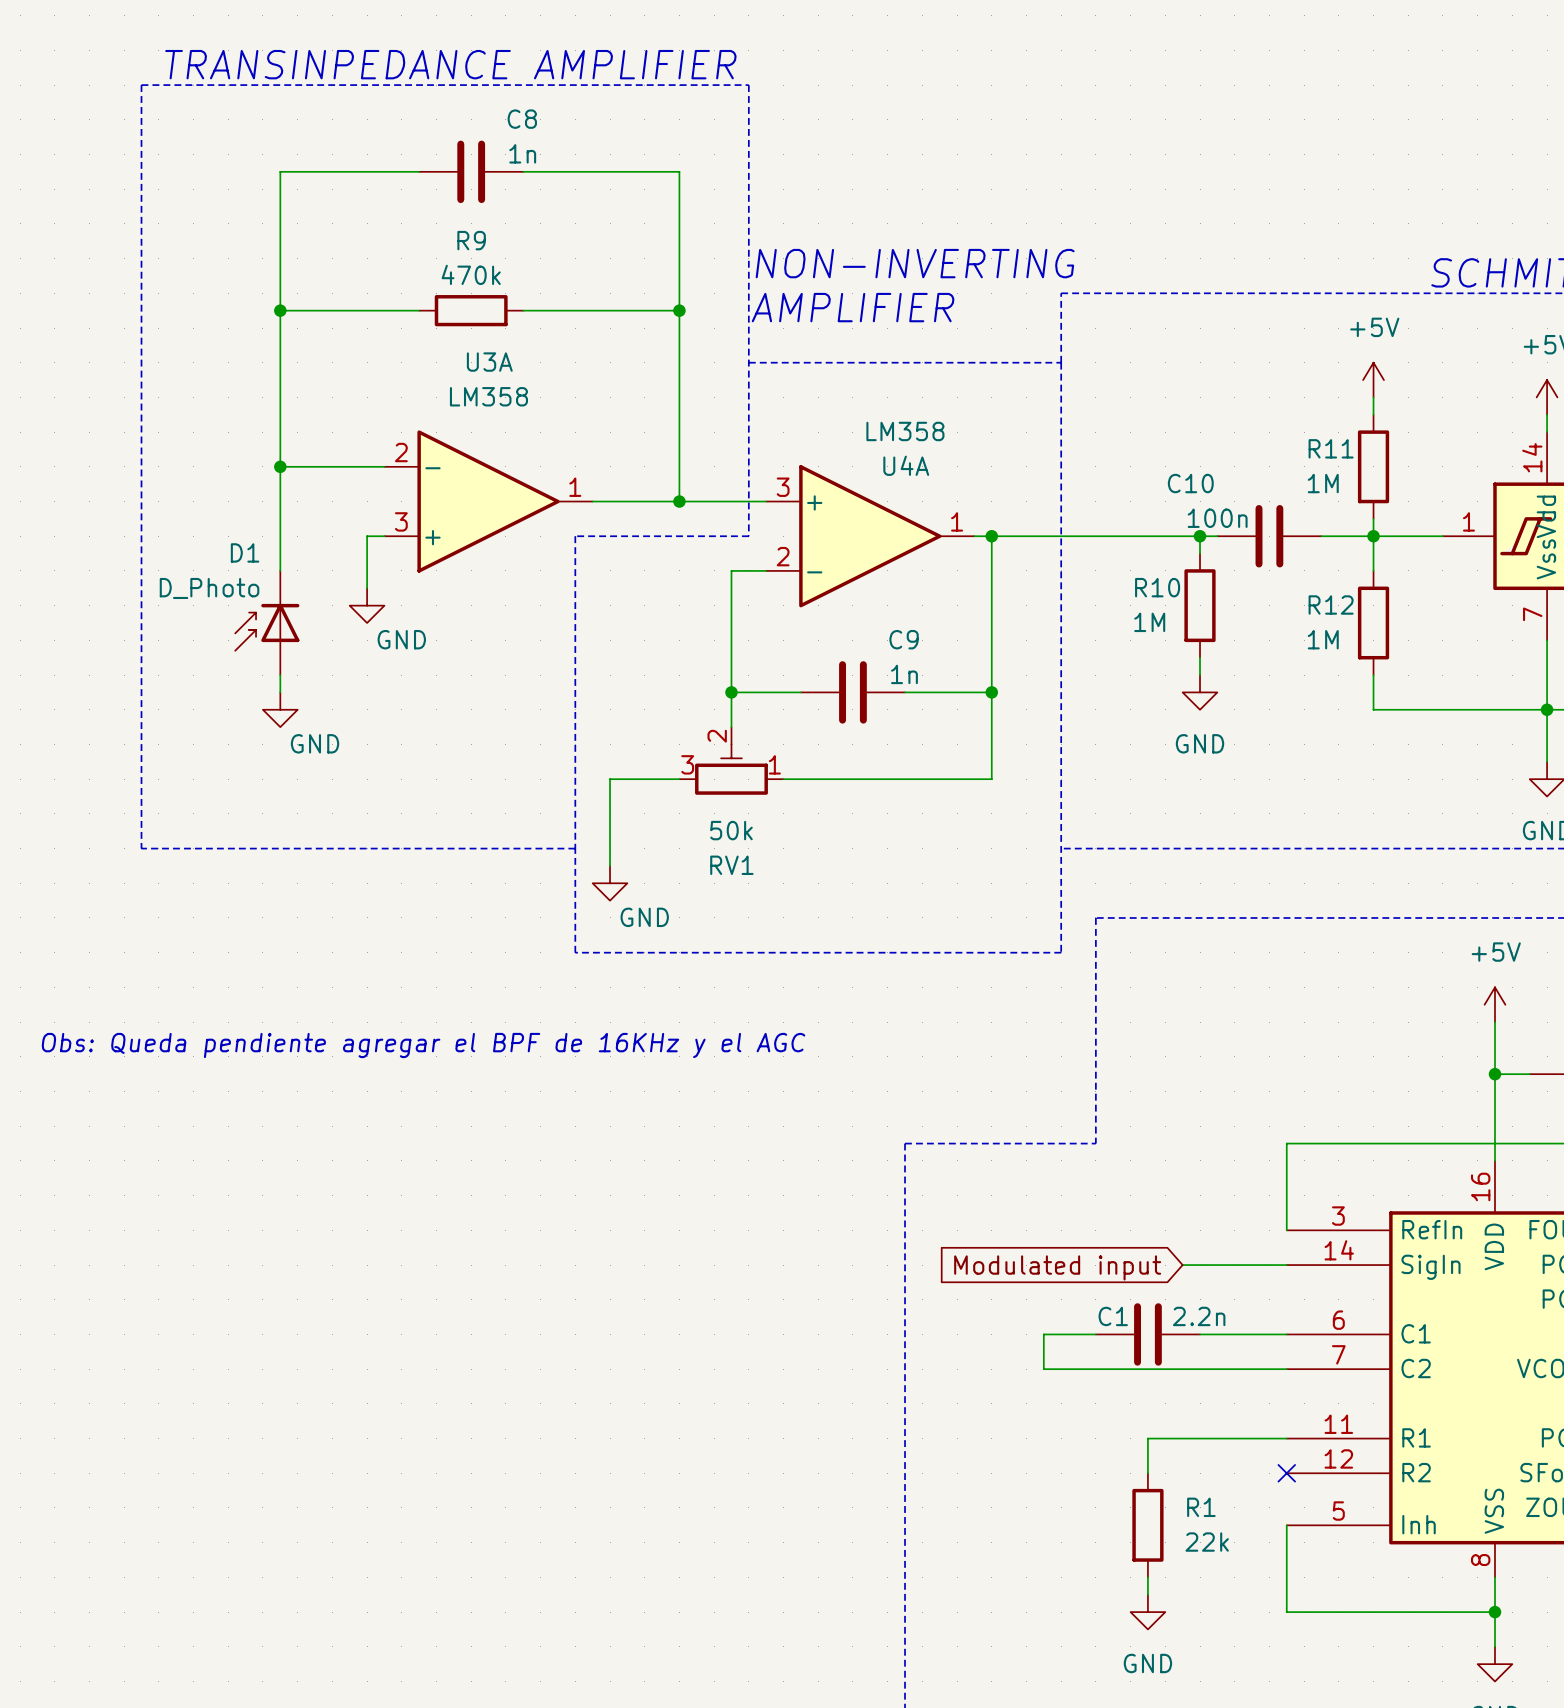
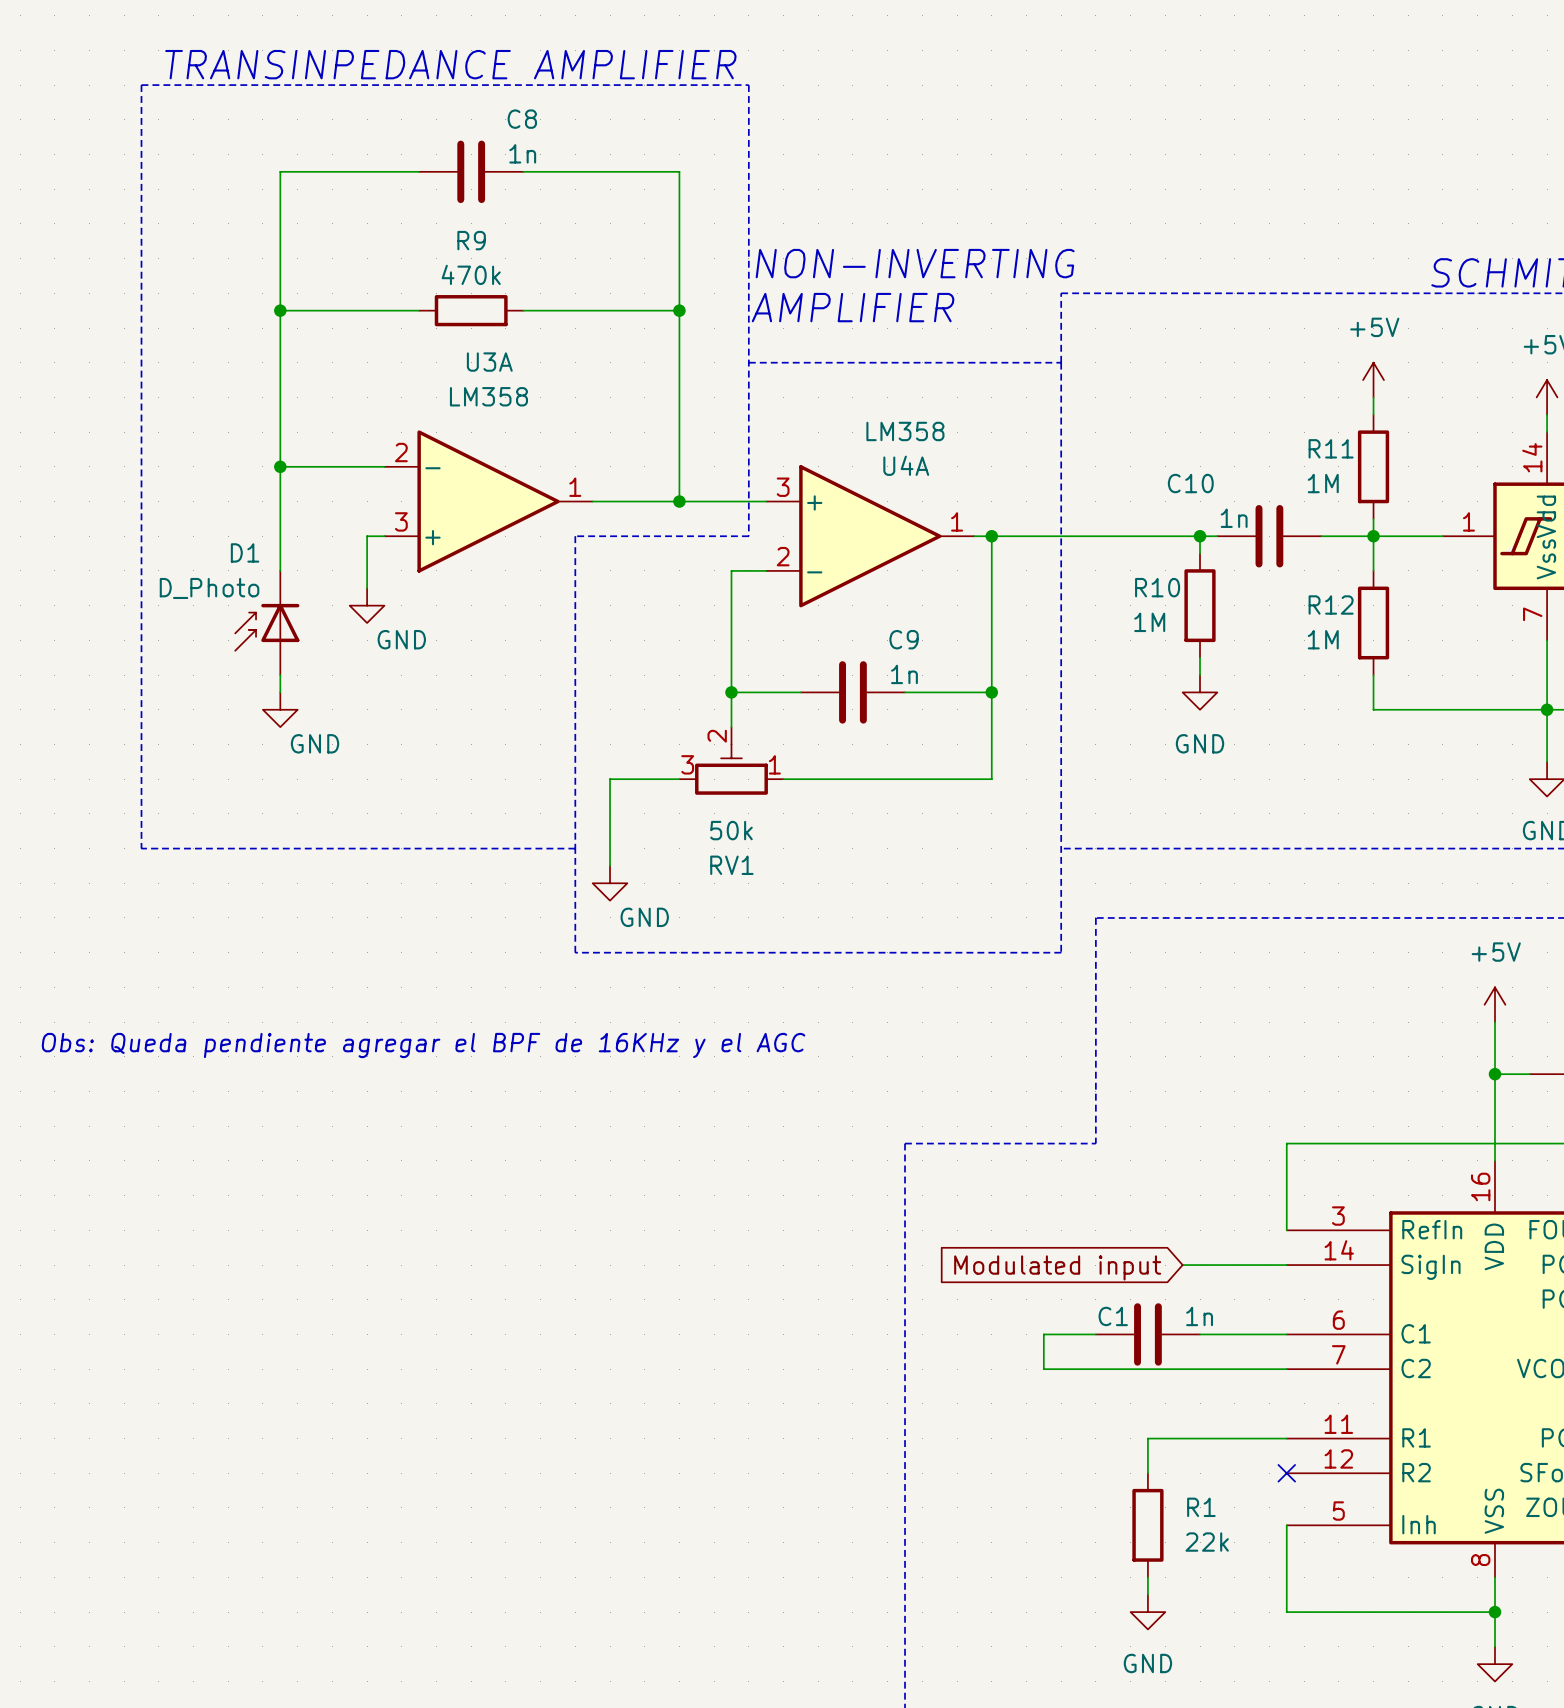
C10 value: 100n (1217, 518) -> 1n (1234, 518)
C1 value: 2.2n (1199, 1316) -> 1n (1199, 1316)

